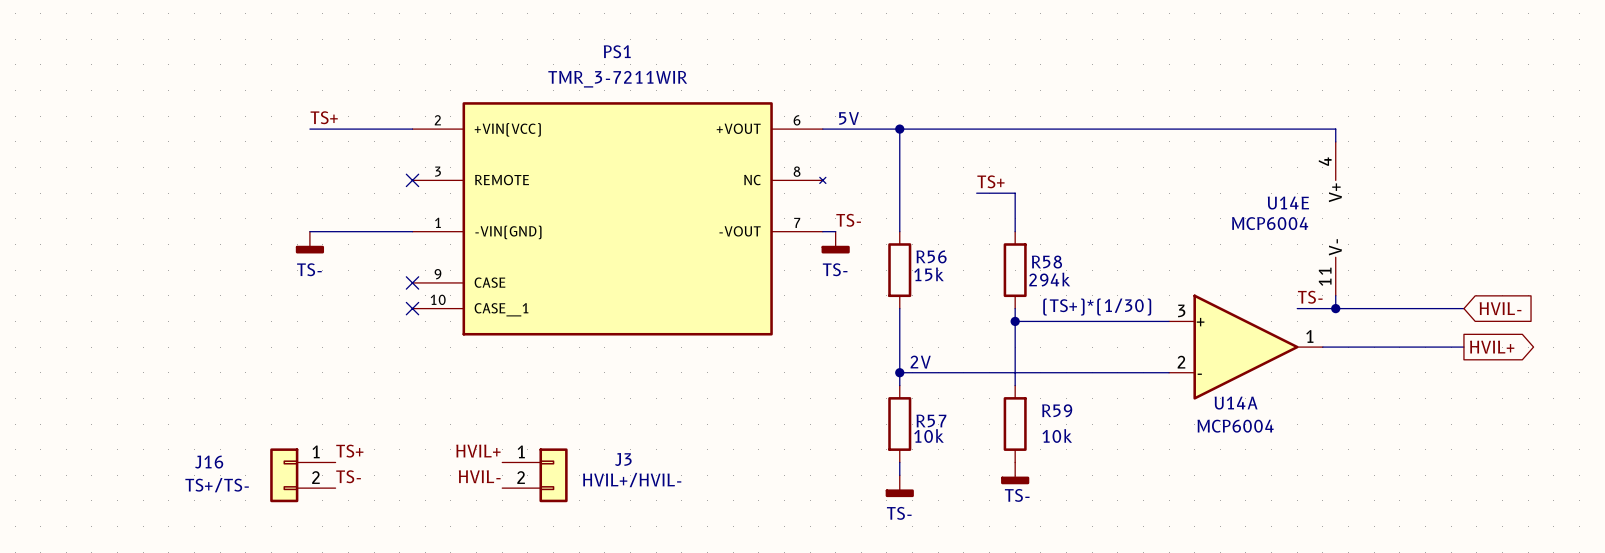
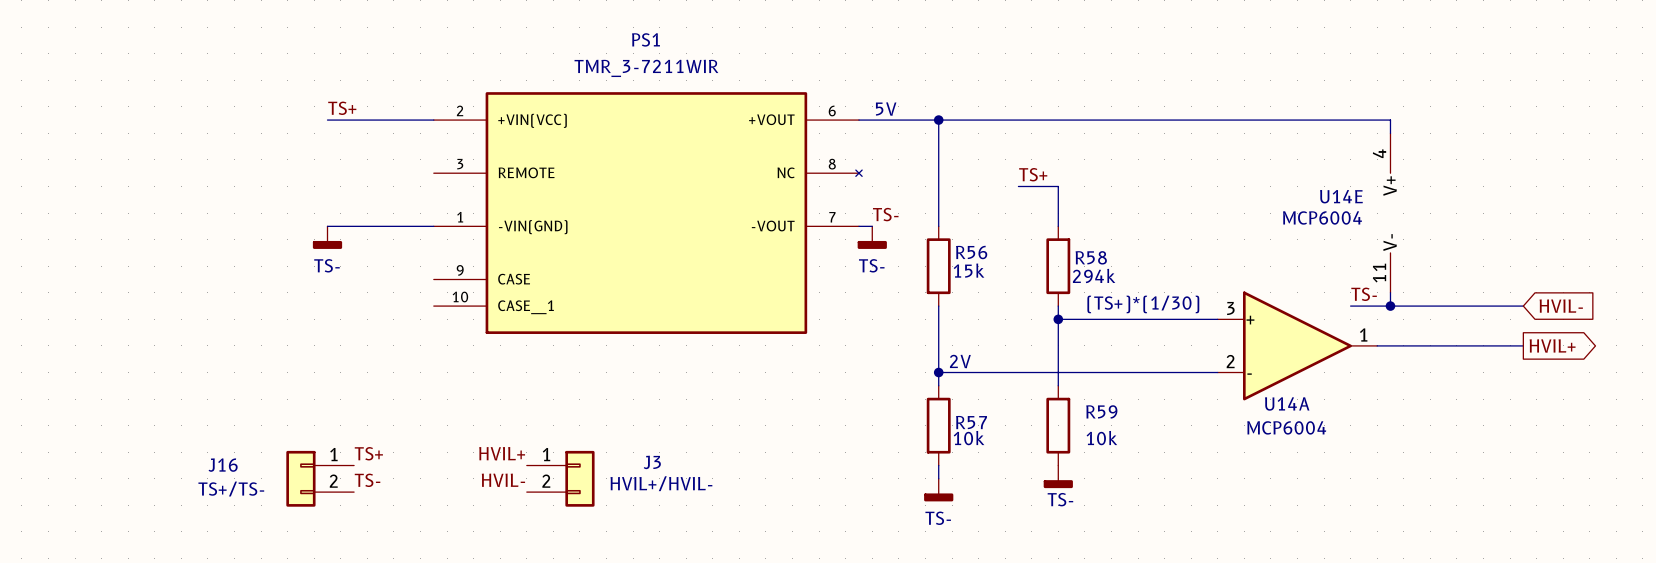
no-connect mark: (412, 180) -> none
no-connect mark: (412, 282) -> none
no-connect mark: (412, 308) -> none

